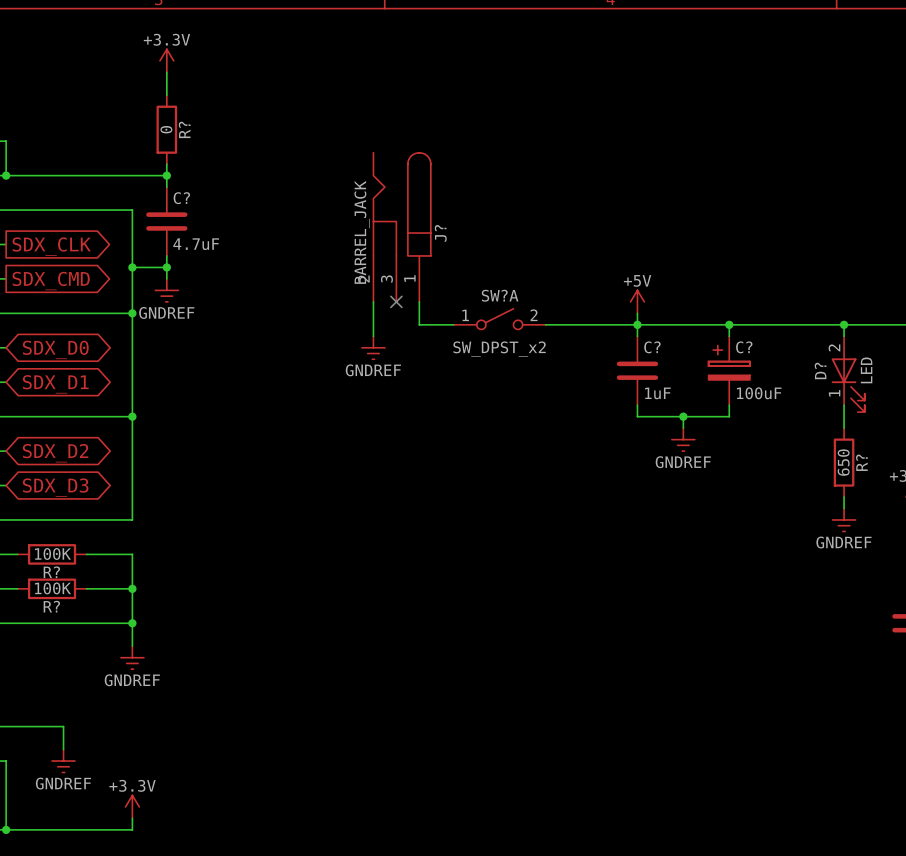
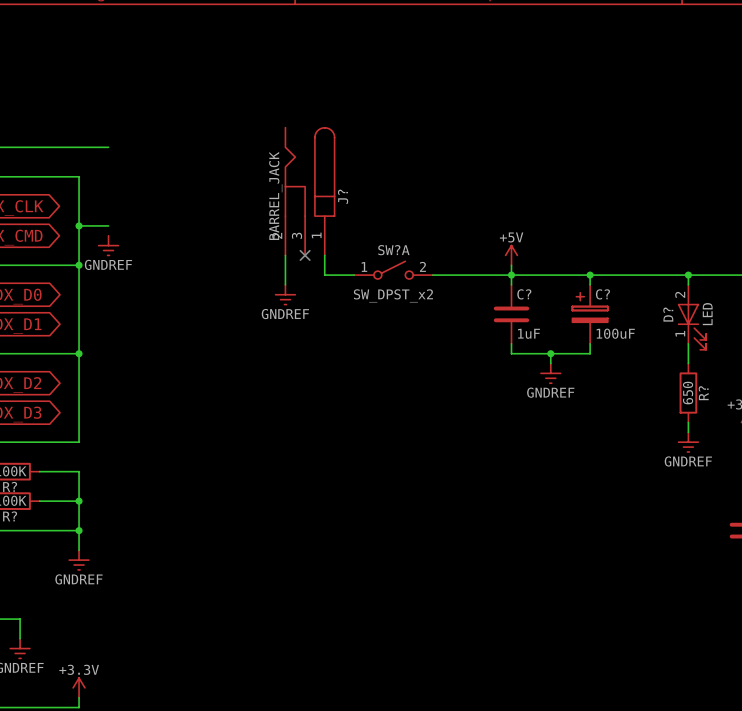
power symbol: +3.3V (166, 60) -> none
wire: (166, 72) (166, 95) -> none
R?: 0 (166, 129) -> none
wire: (166, 164) (166, 187) -> none
junction: (166, 175) -> none
C?: 4.7uF (166, 221) -> none
wire: (166, 255) (166, 278) -> none
junction: (166, 267) -> none

